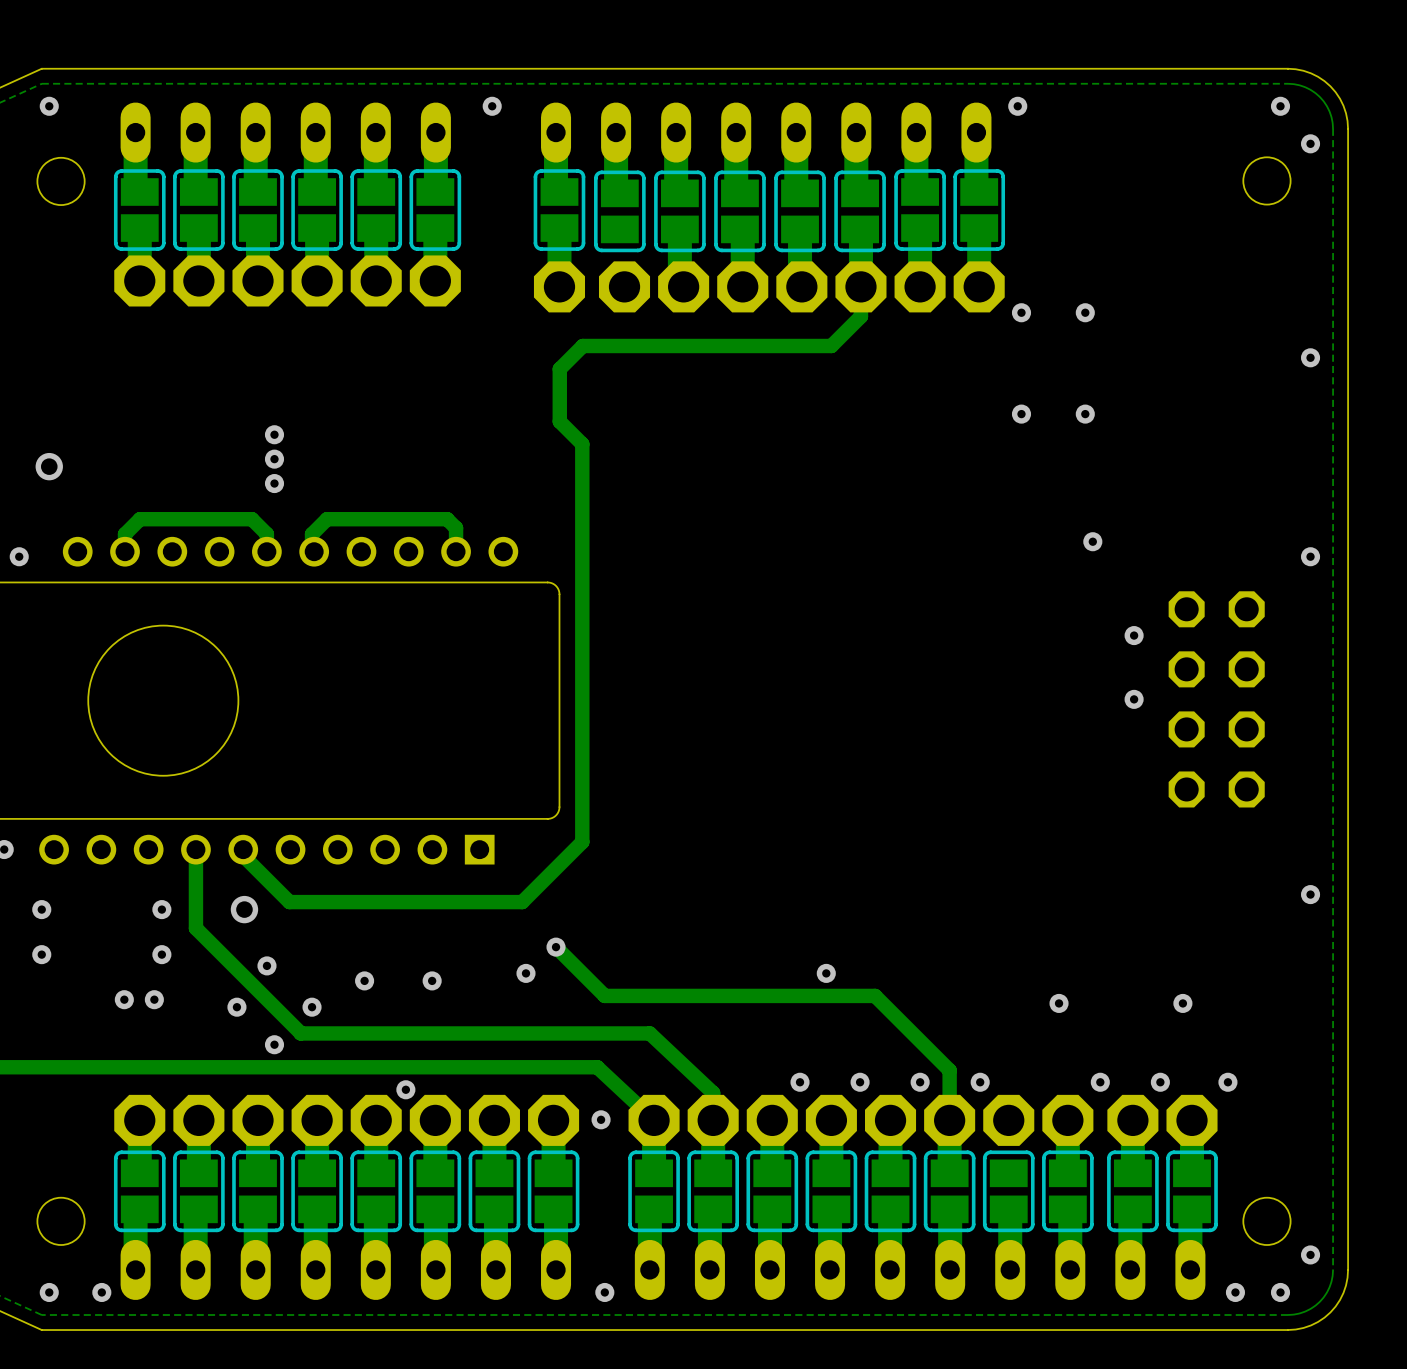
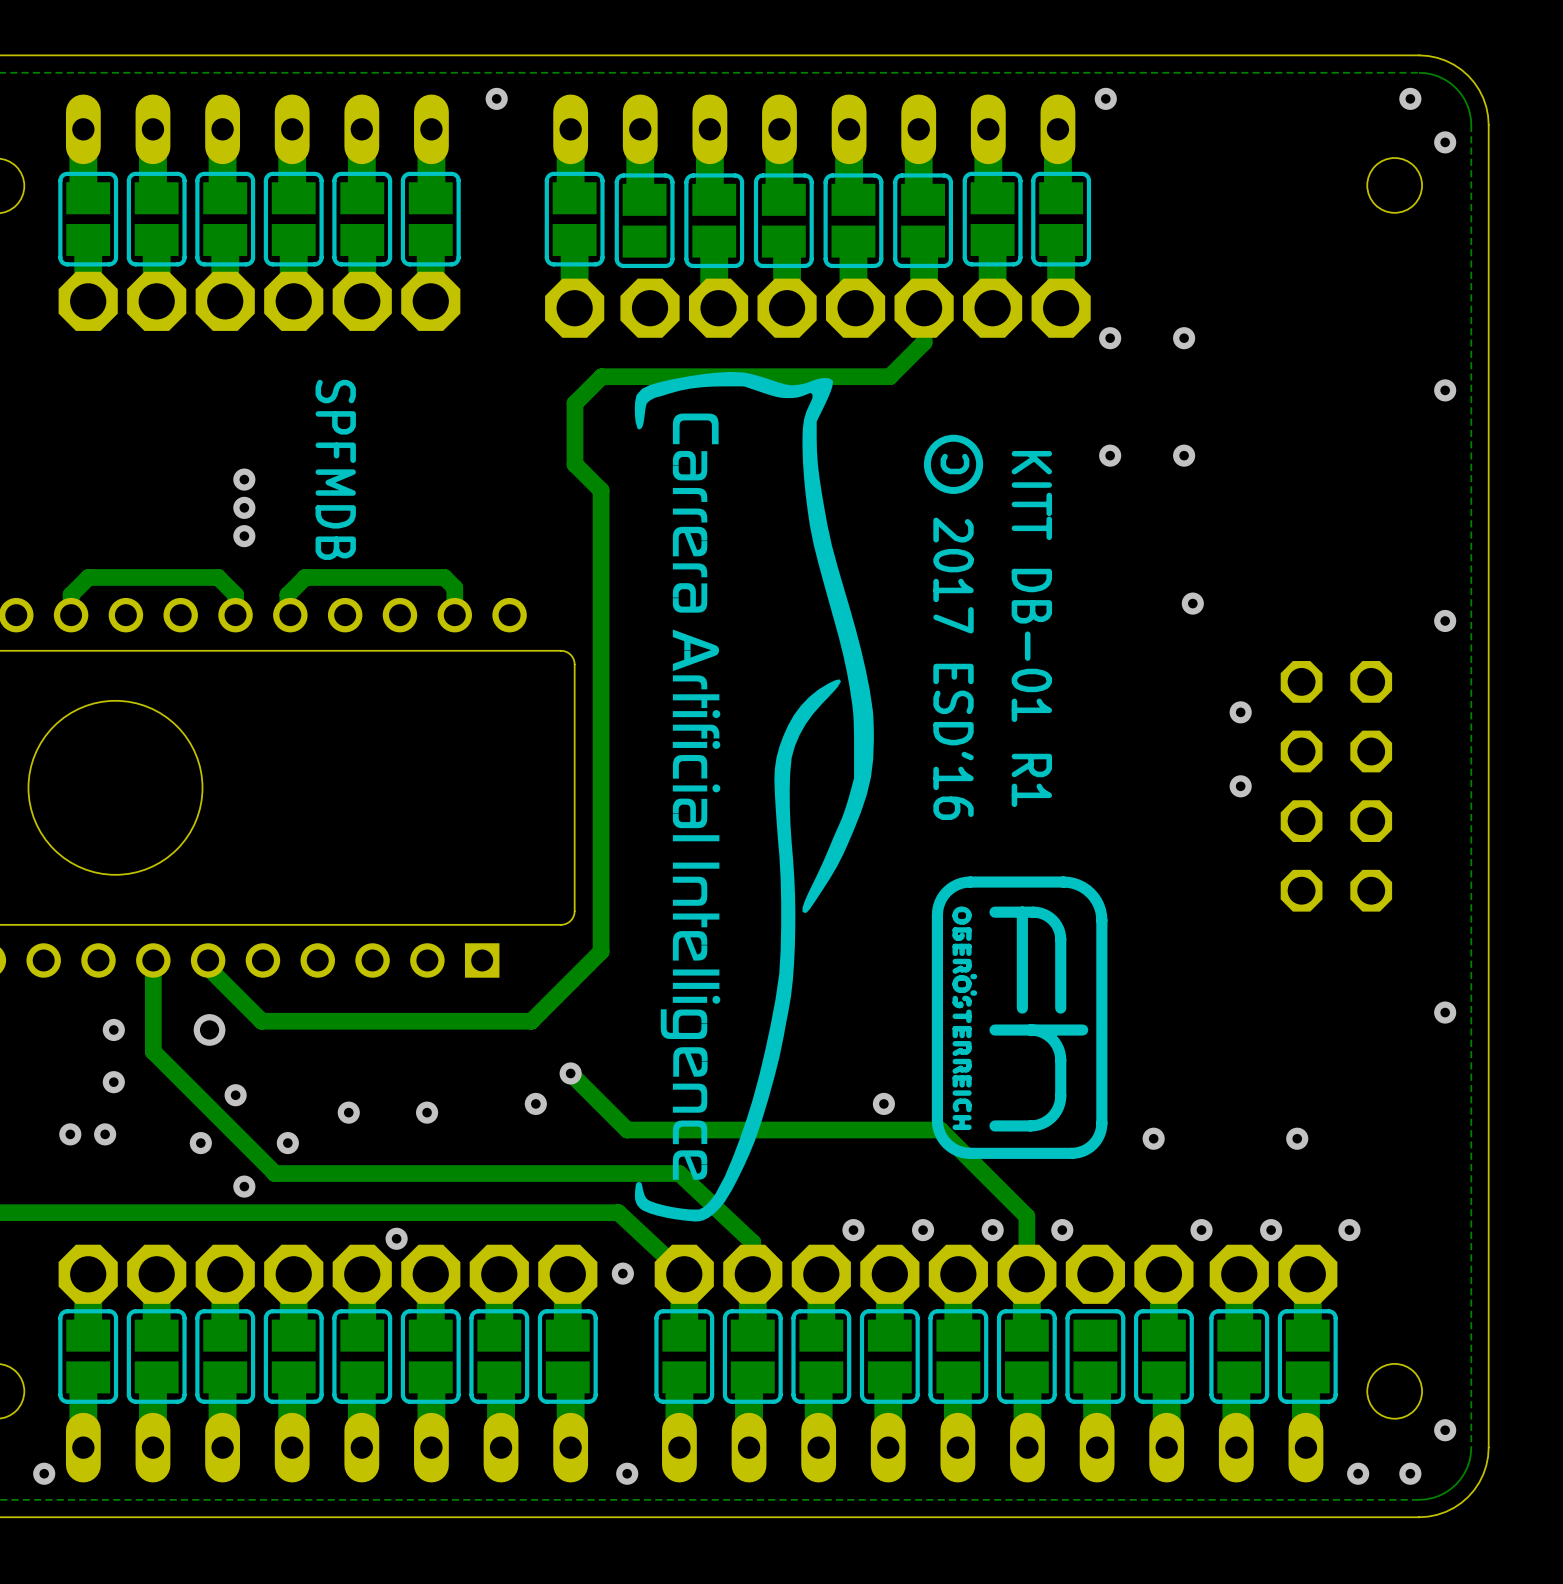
drawing: none -> [634, 371, 874, 1222]
drawing: none -> [923, 434, 984, 494]
text: none -> c (954, 464)
text: none -> SPFMDB (335, 469)
text: none -> KITT DB-01 R1 (1031, 628)
text: none -> 2017 ESD'16 (953, 668)
drawing: none -> [931, 876, 1108, 1159]

